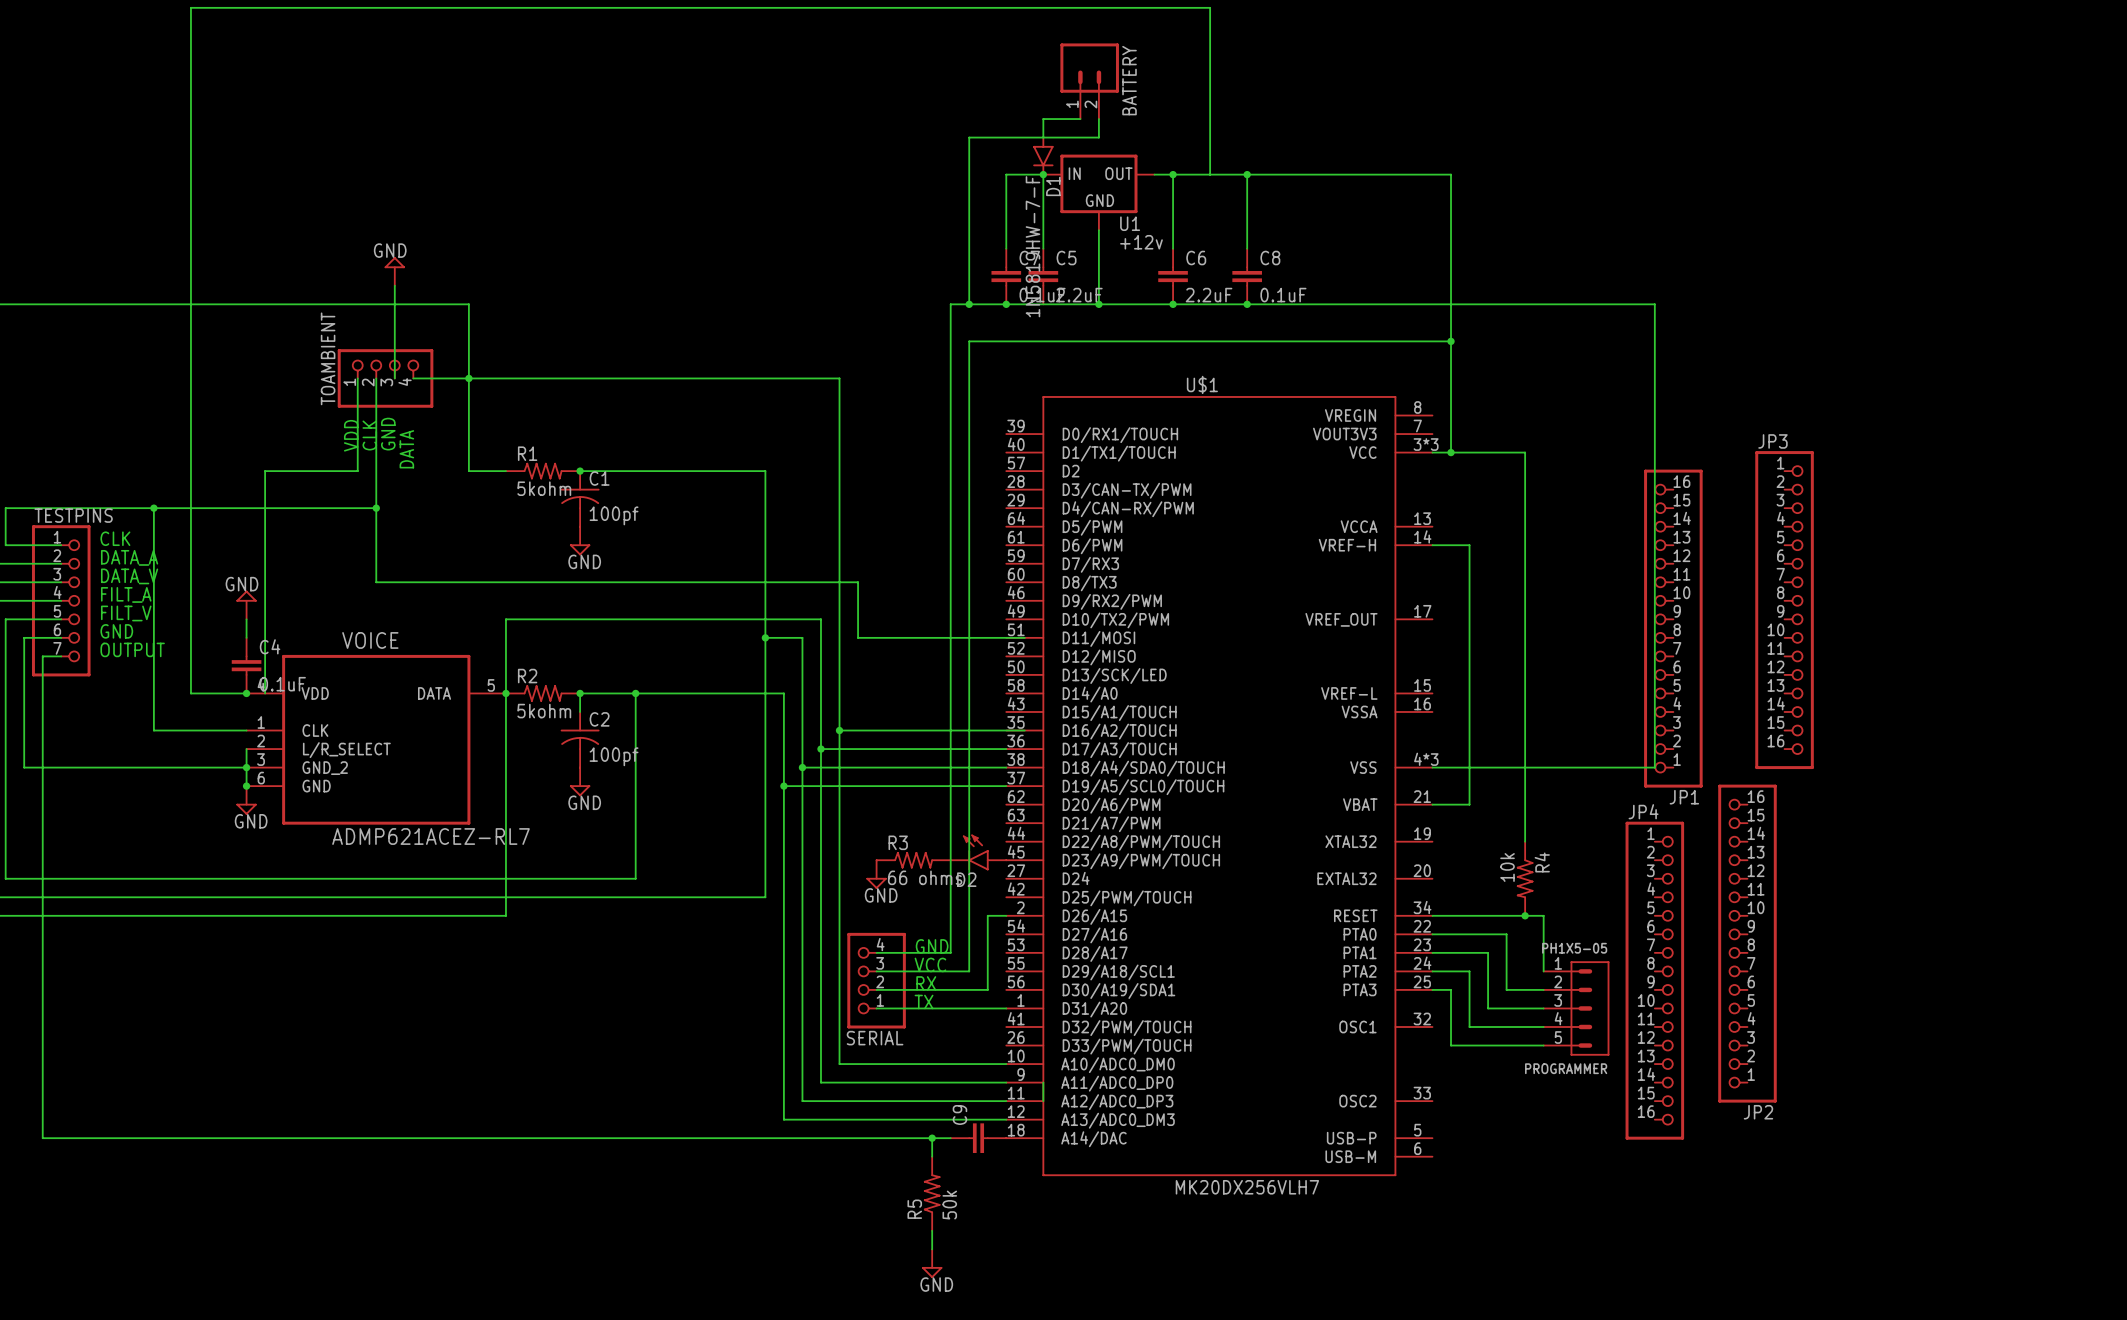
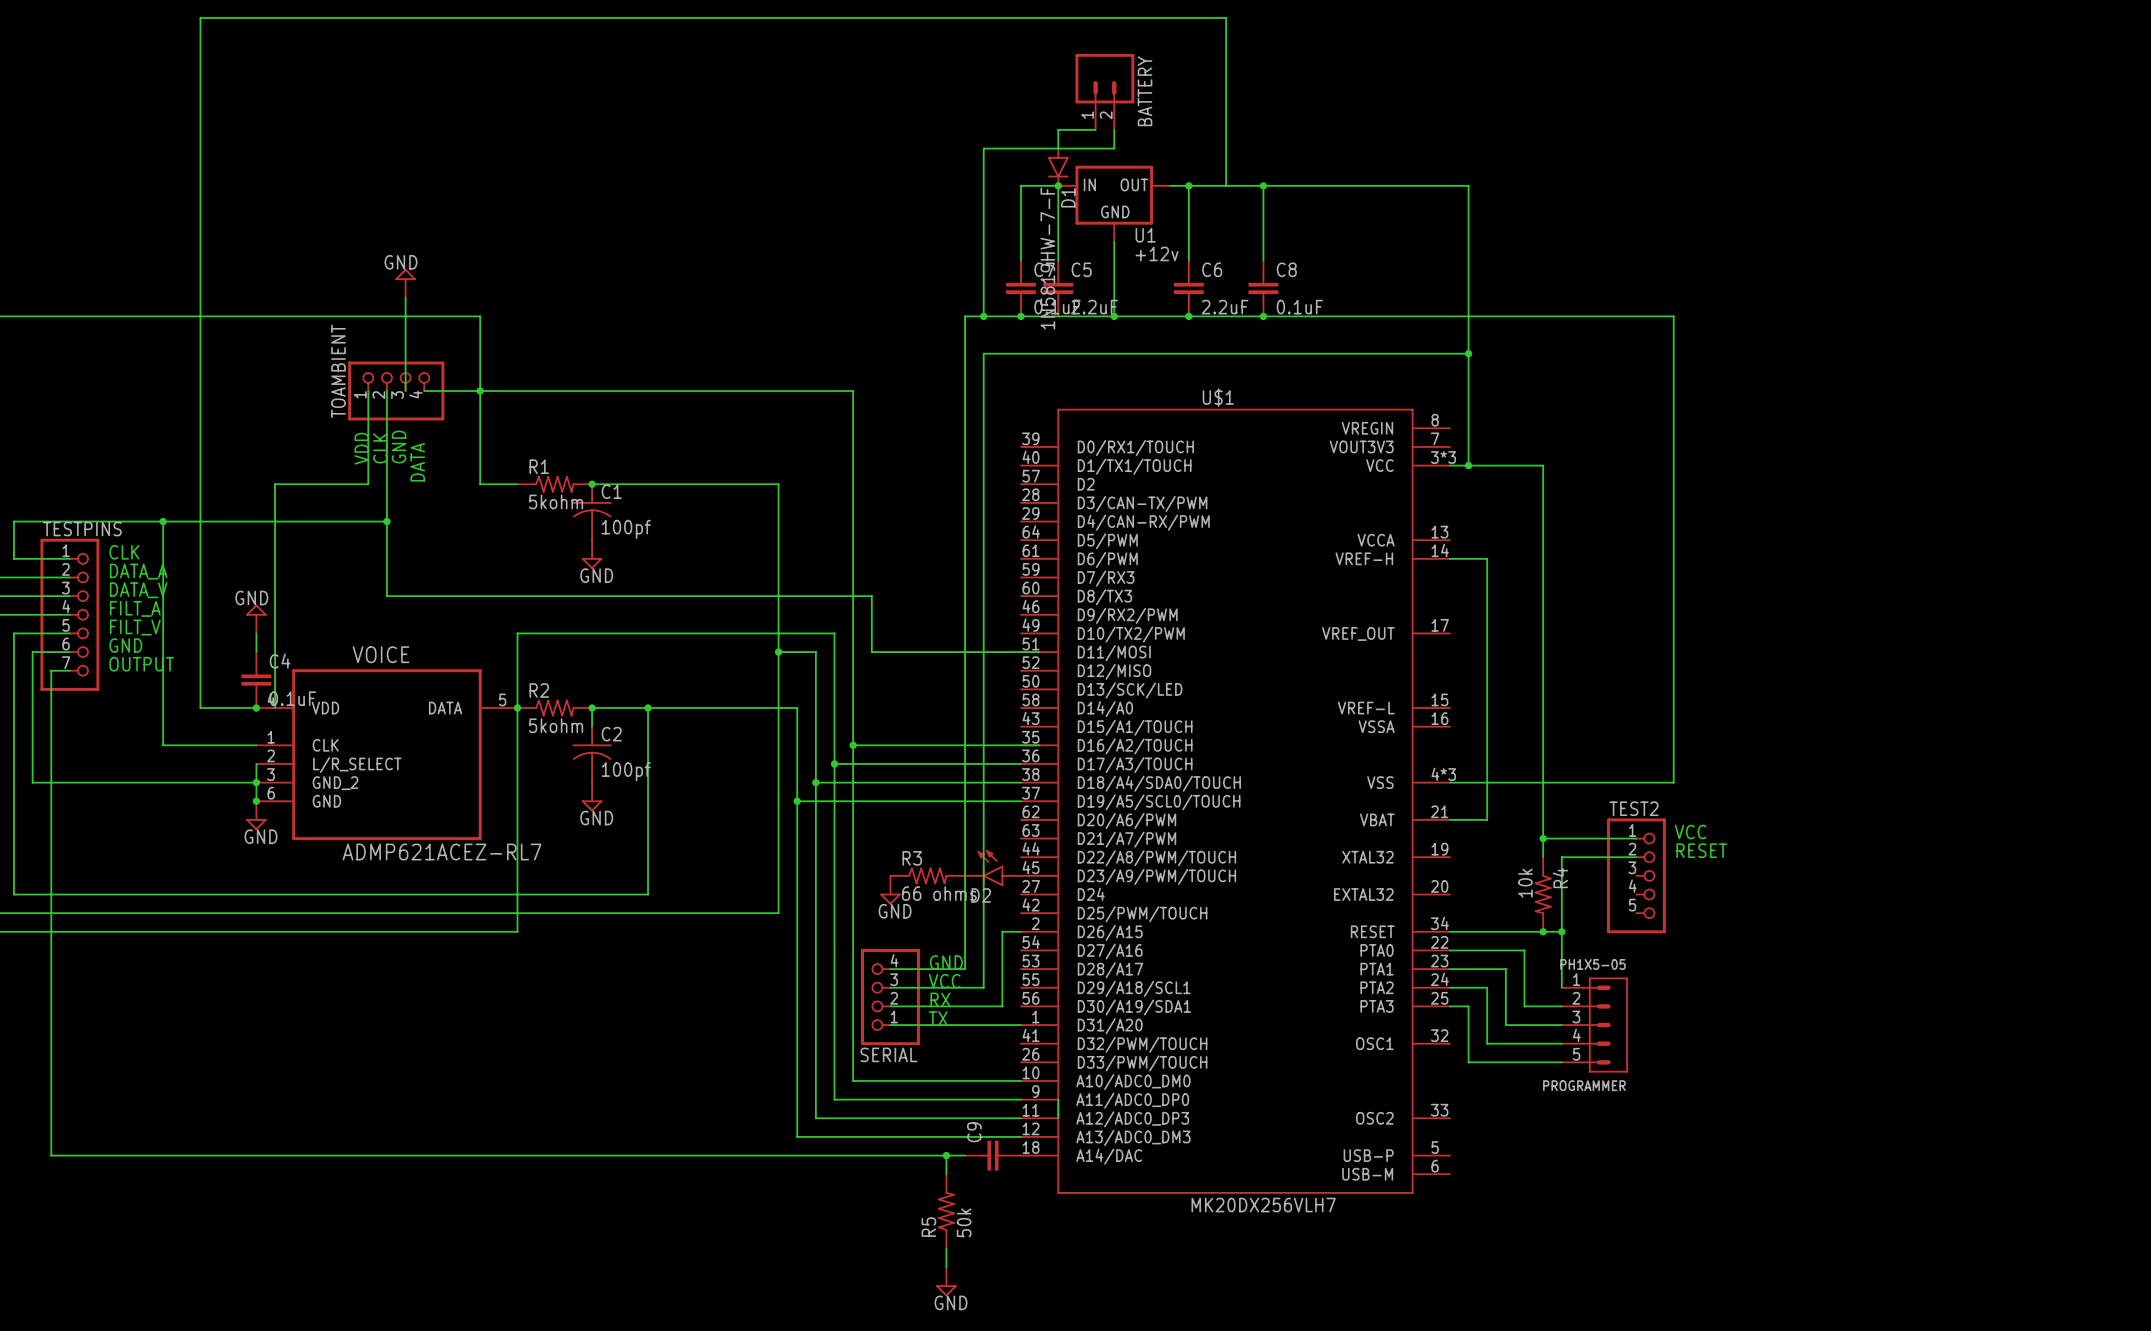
JP3: (1784, 610) -> none
JP1: (1673, 628) -> none
text: none -> VCC (1690, 832)
wire: none -> (1543, 838) (1636, 838)
junction: none -> (1543, 838)
text: none -> RESET (1701, 850)
wire: none -> (1636, 857) (1561, 857) (1561, 931)
TEST2: none -> (1636, 875)
junction: none -> (1561, 931)
JP2: (1747, 943) -> none
JP4: (1654, 980) -> none

